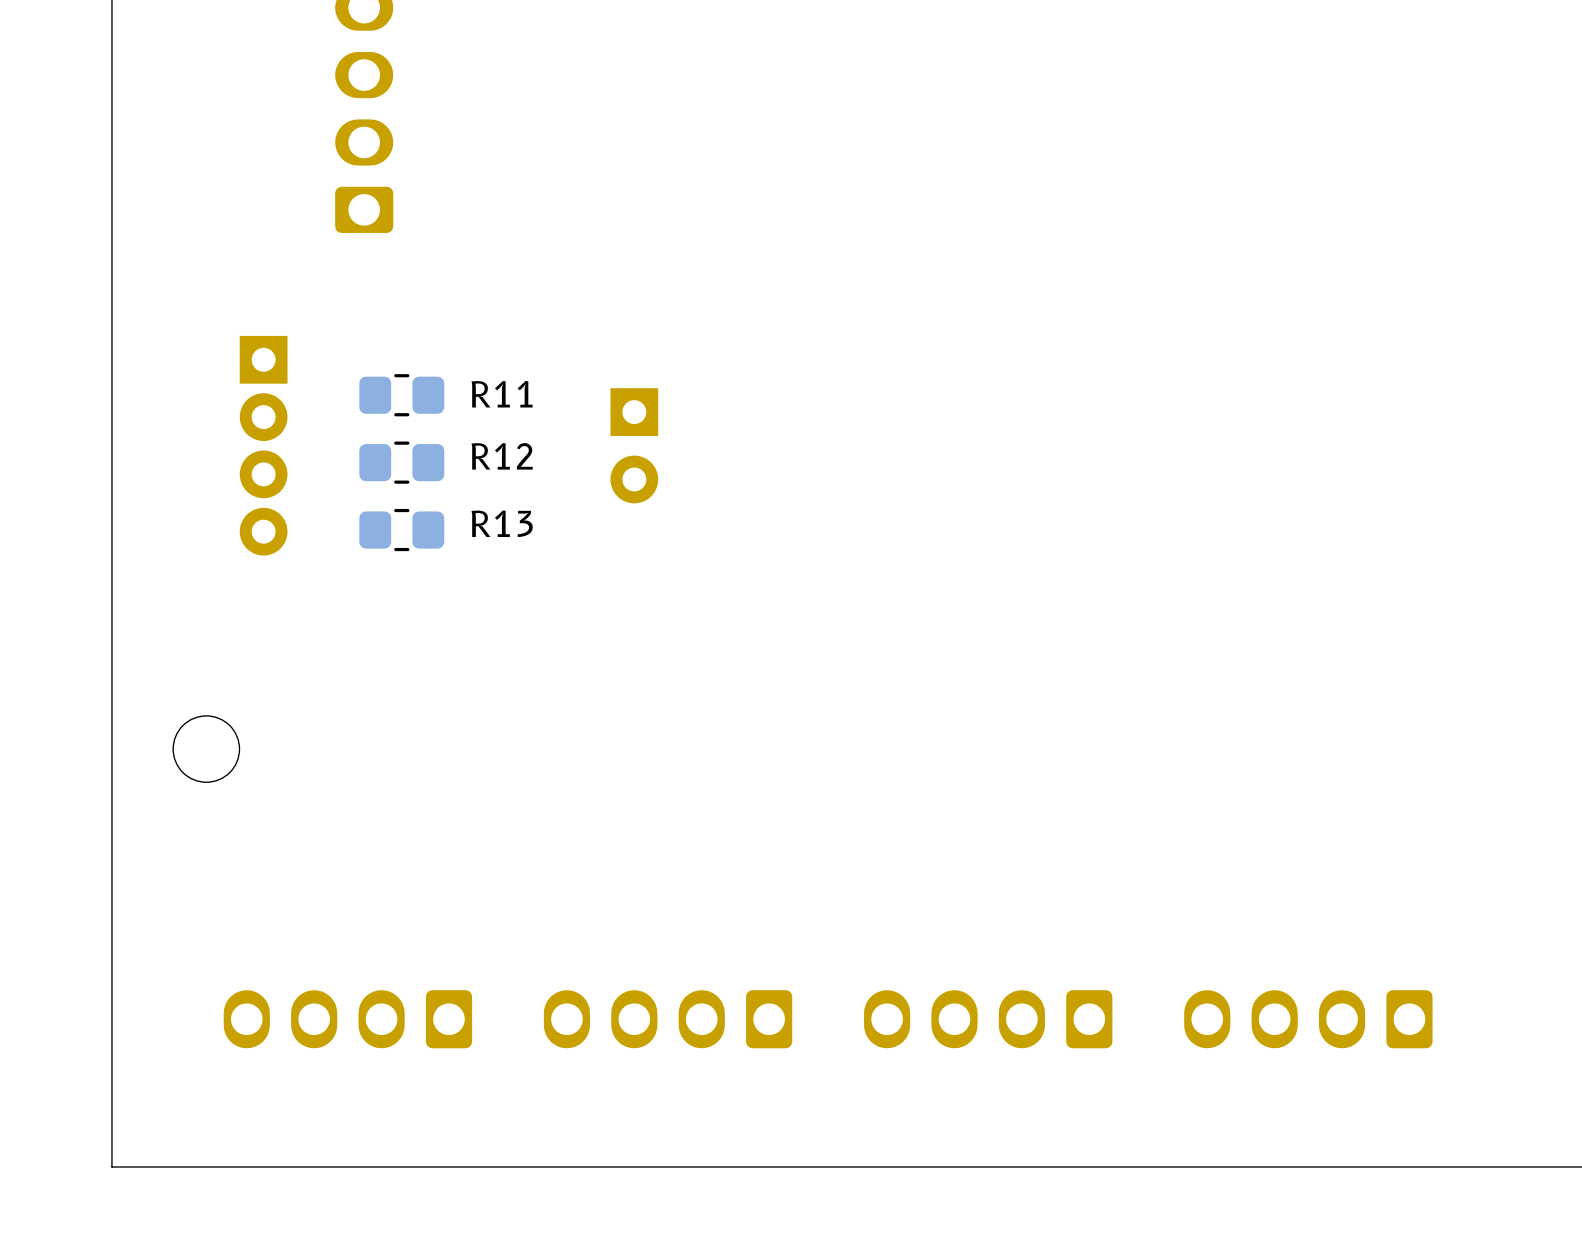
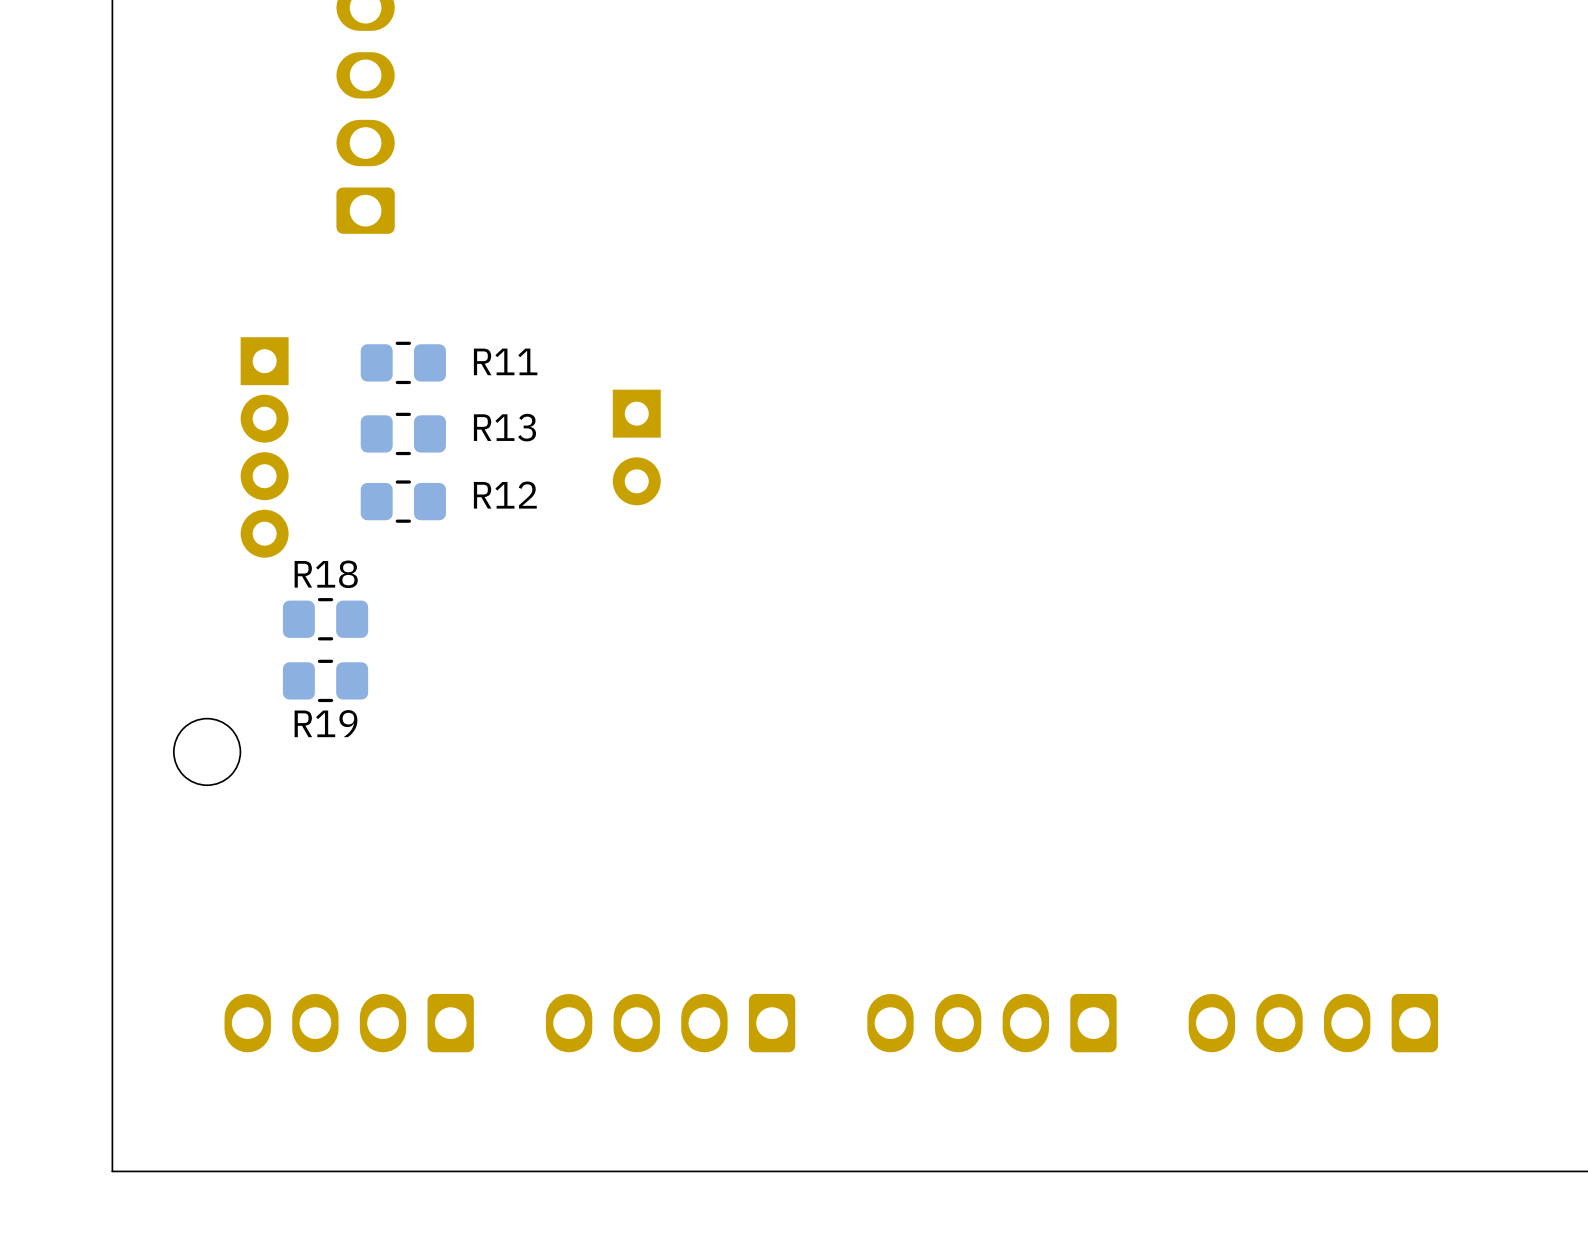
R11 position: (401, 395) -> (403, 362)
R12 position: (401, 462) -> (403, 501)
R13 position: (401, 530) -> (403, 433)
R18: none -> (325, 619)
R19: none -> (325, 680)

